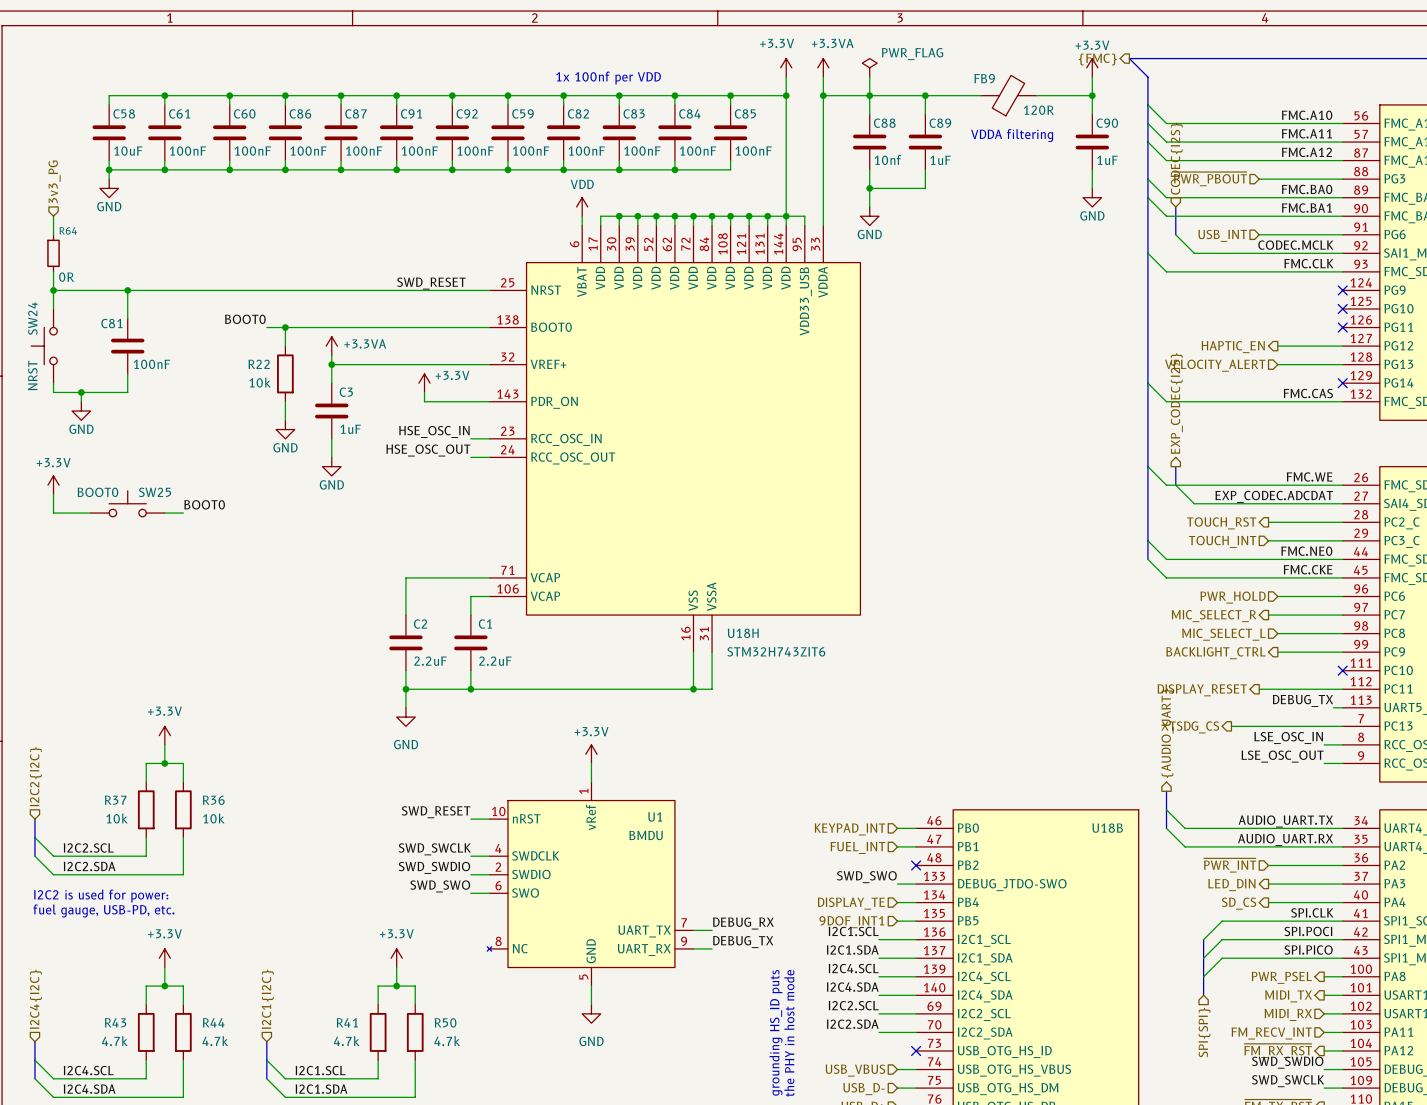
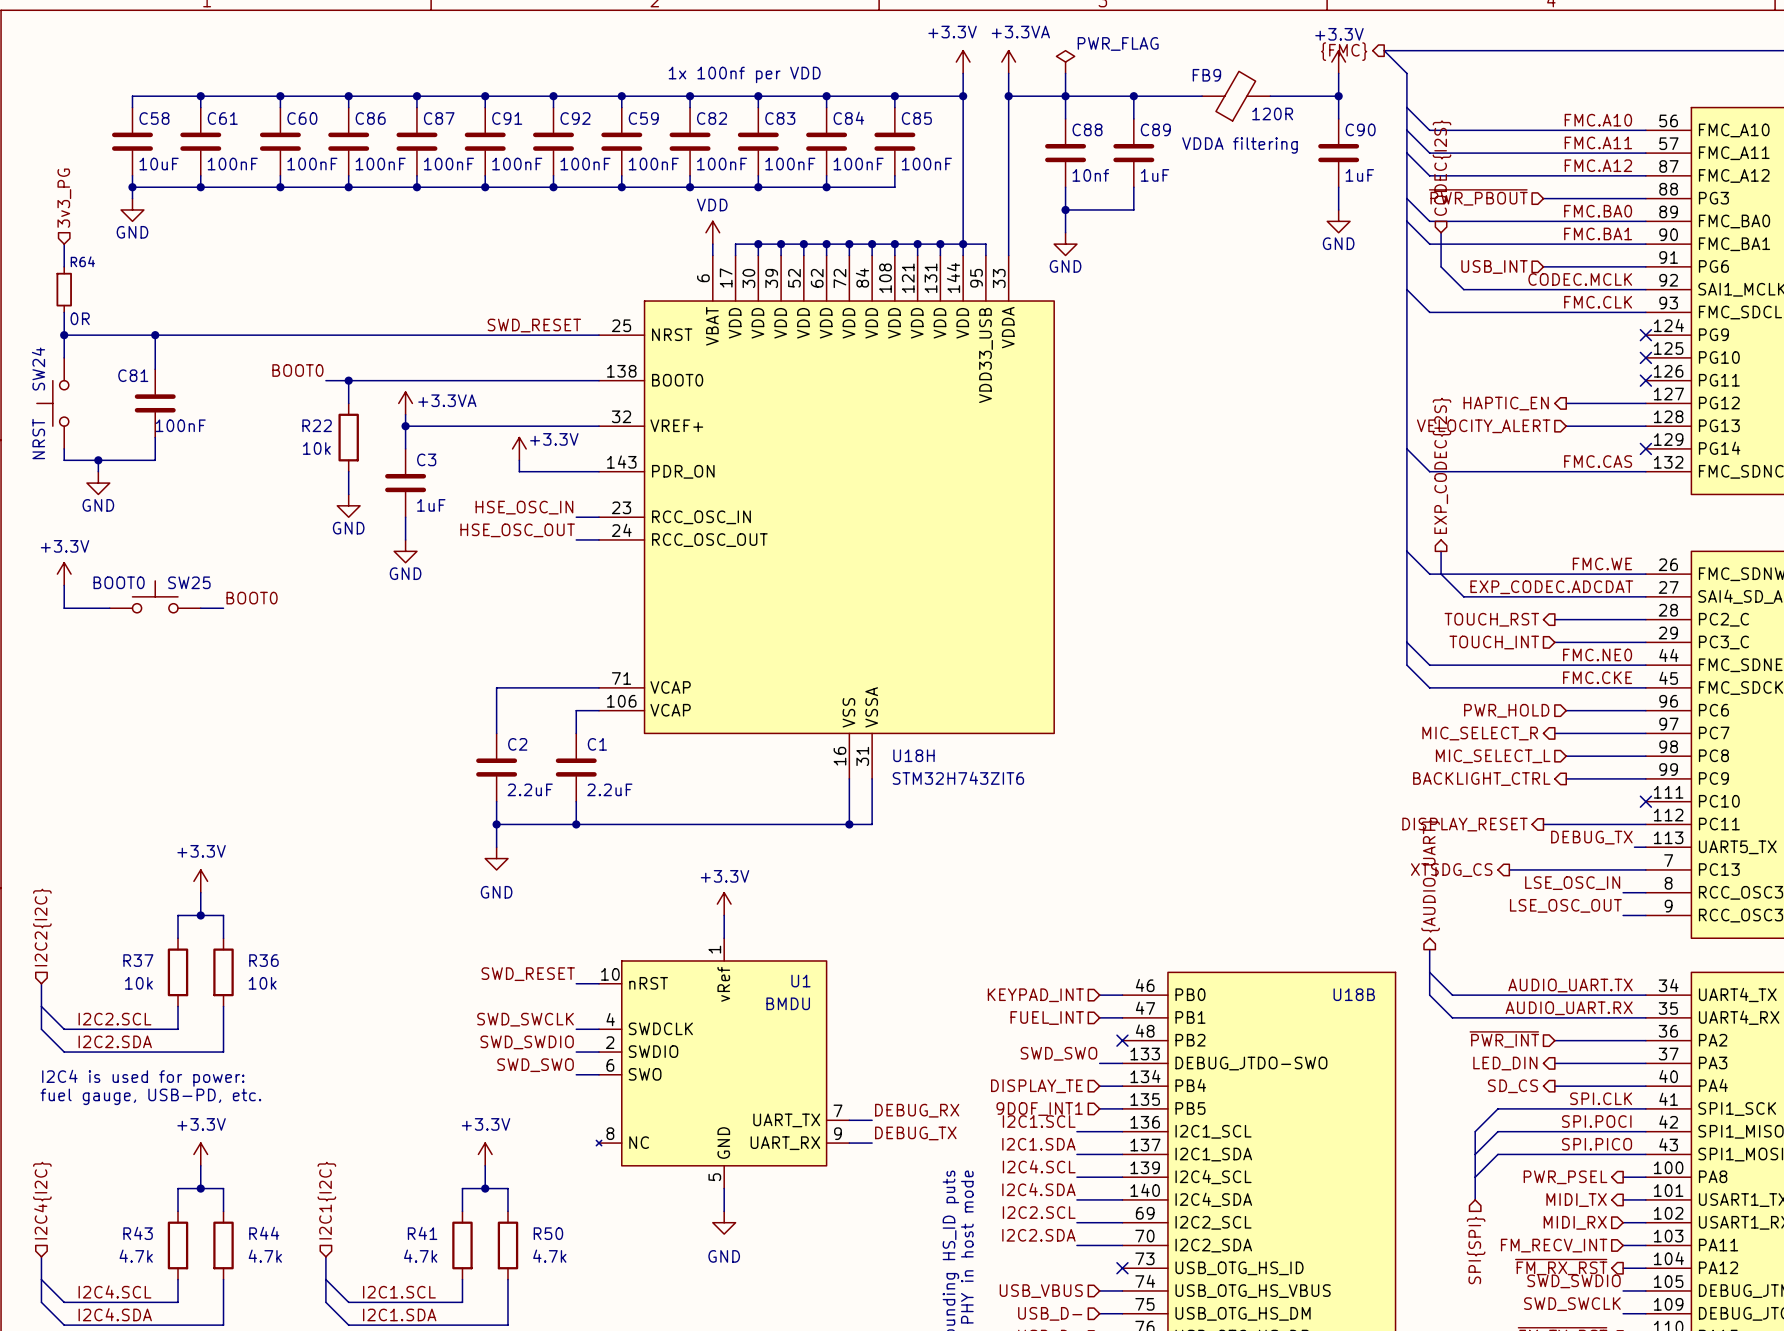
text: I2C2 is used for power: (101, 896) -> I2C4 is used for power: (143, 1078)

